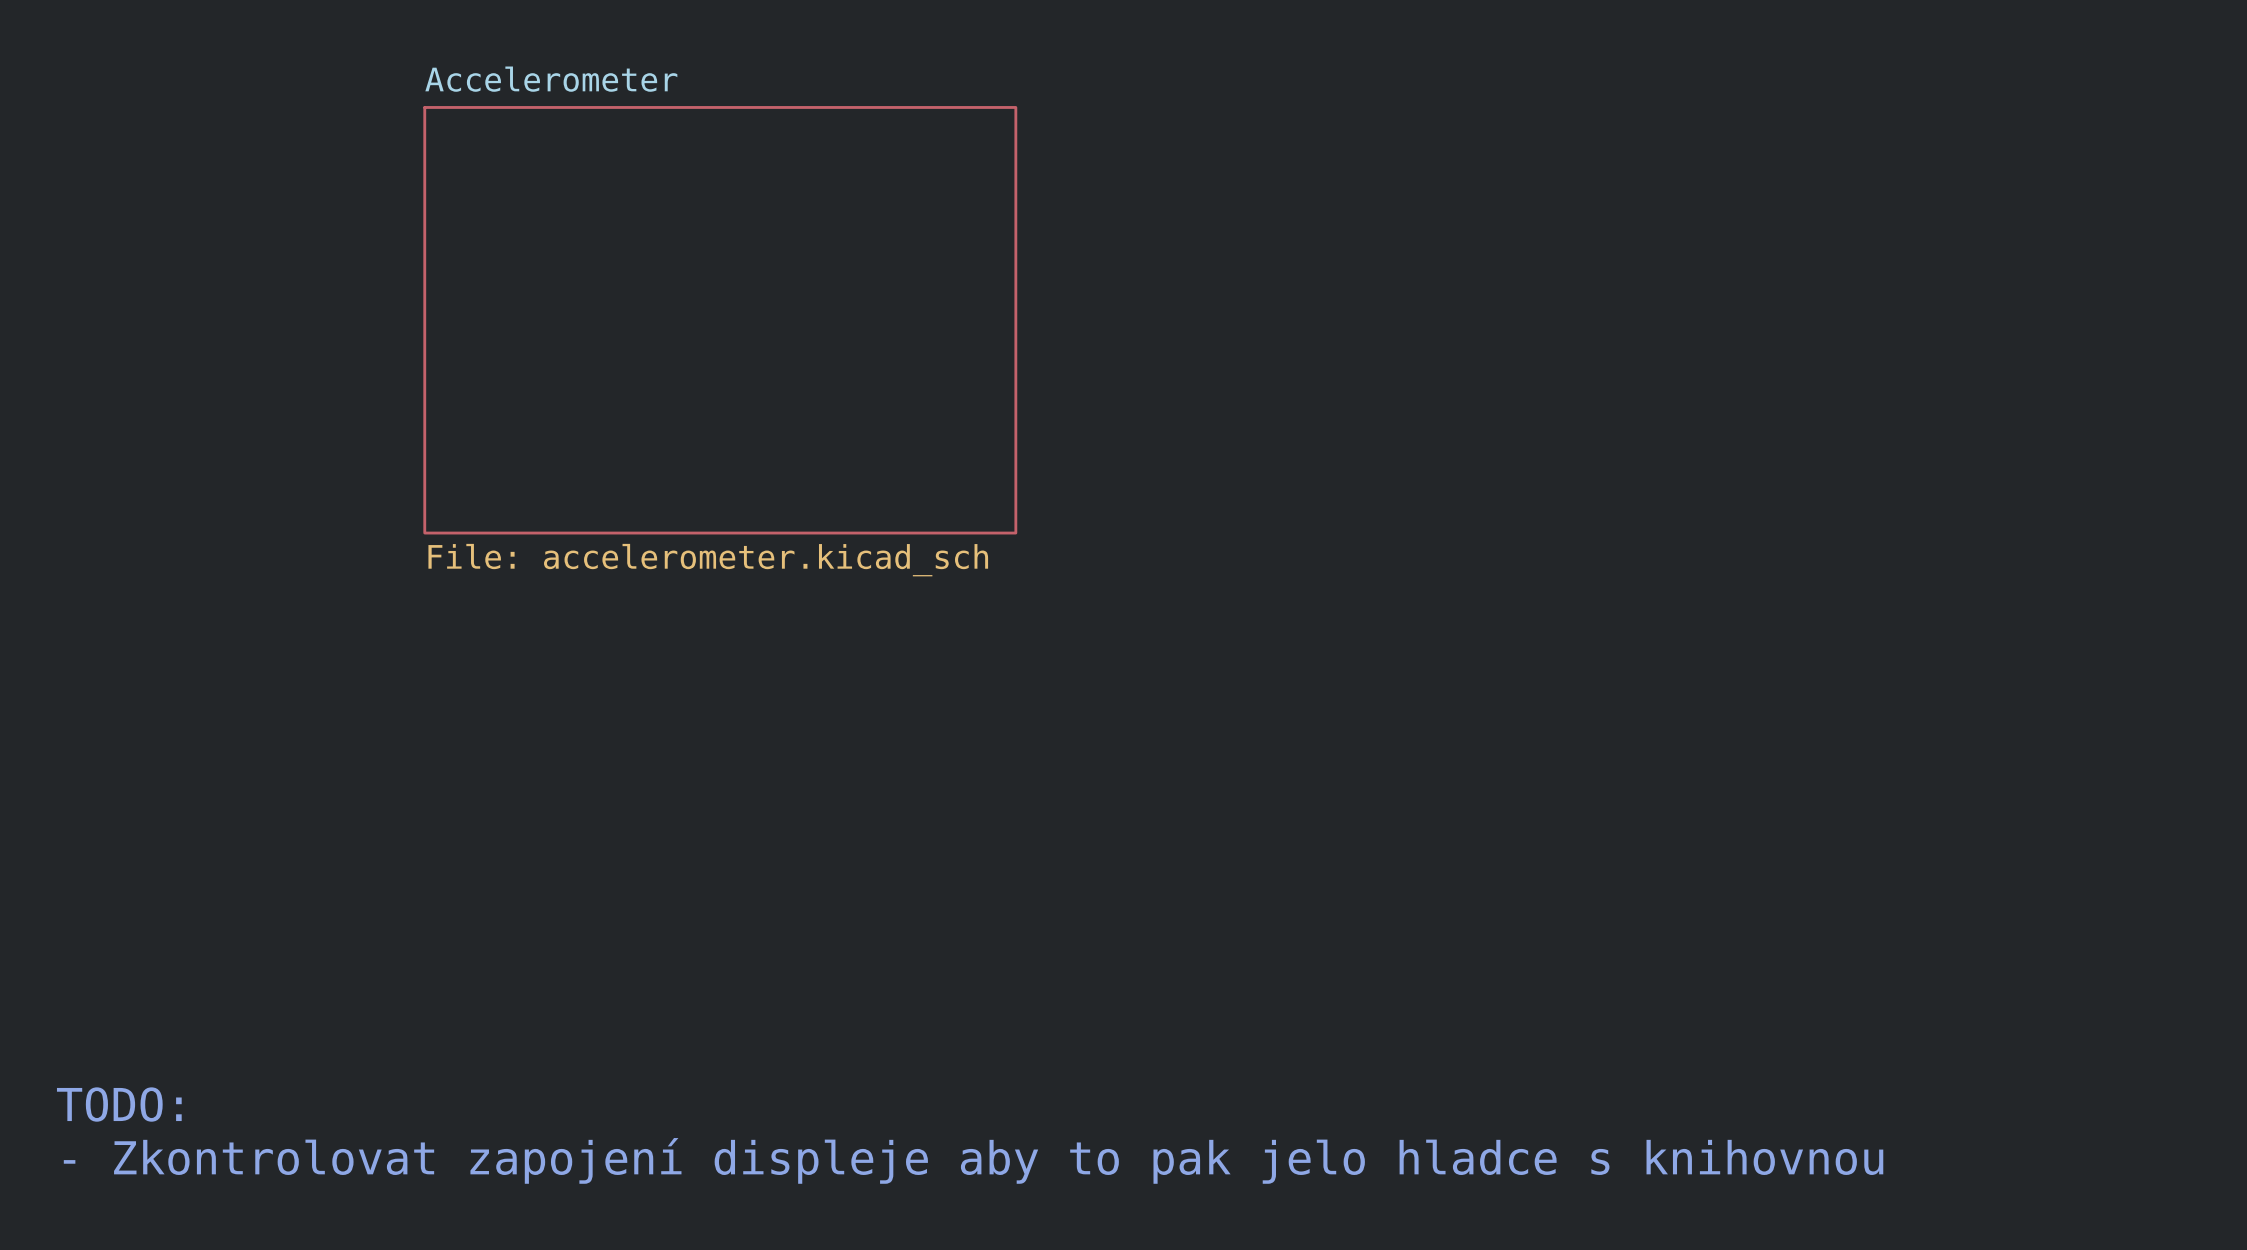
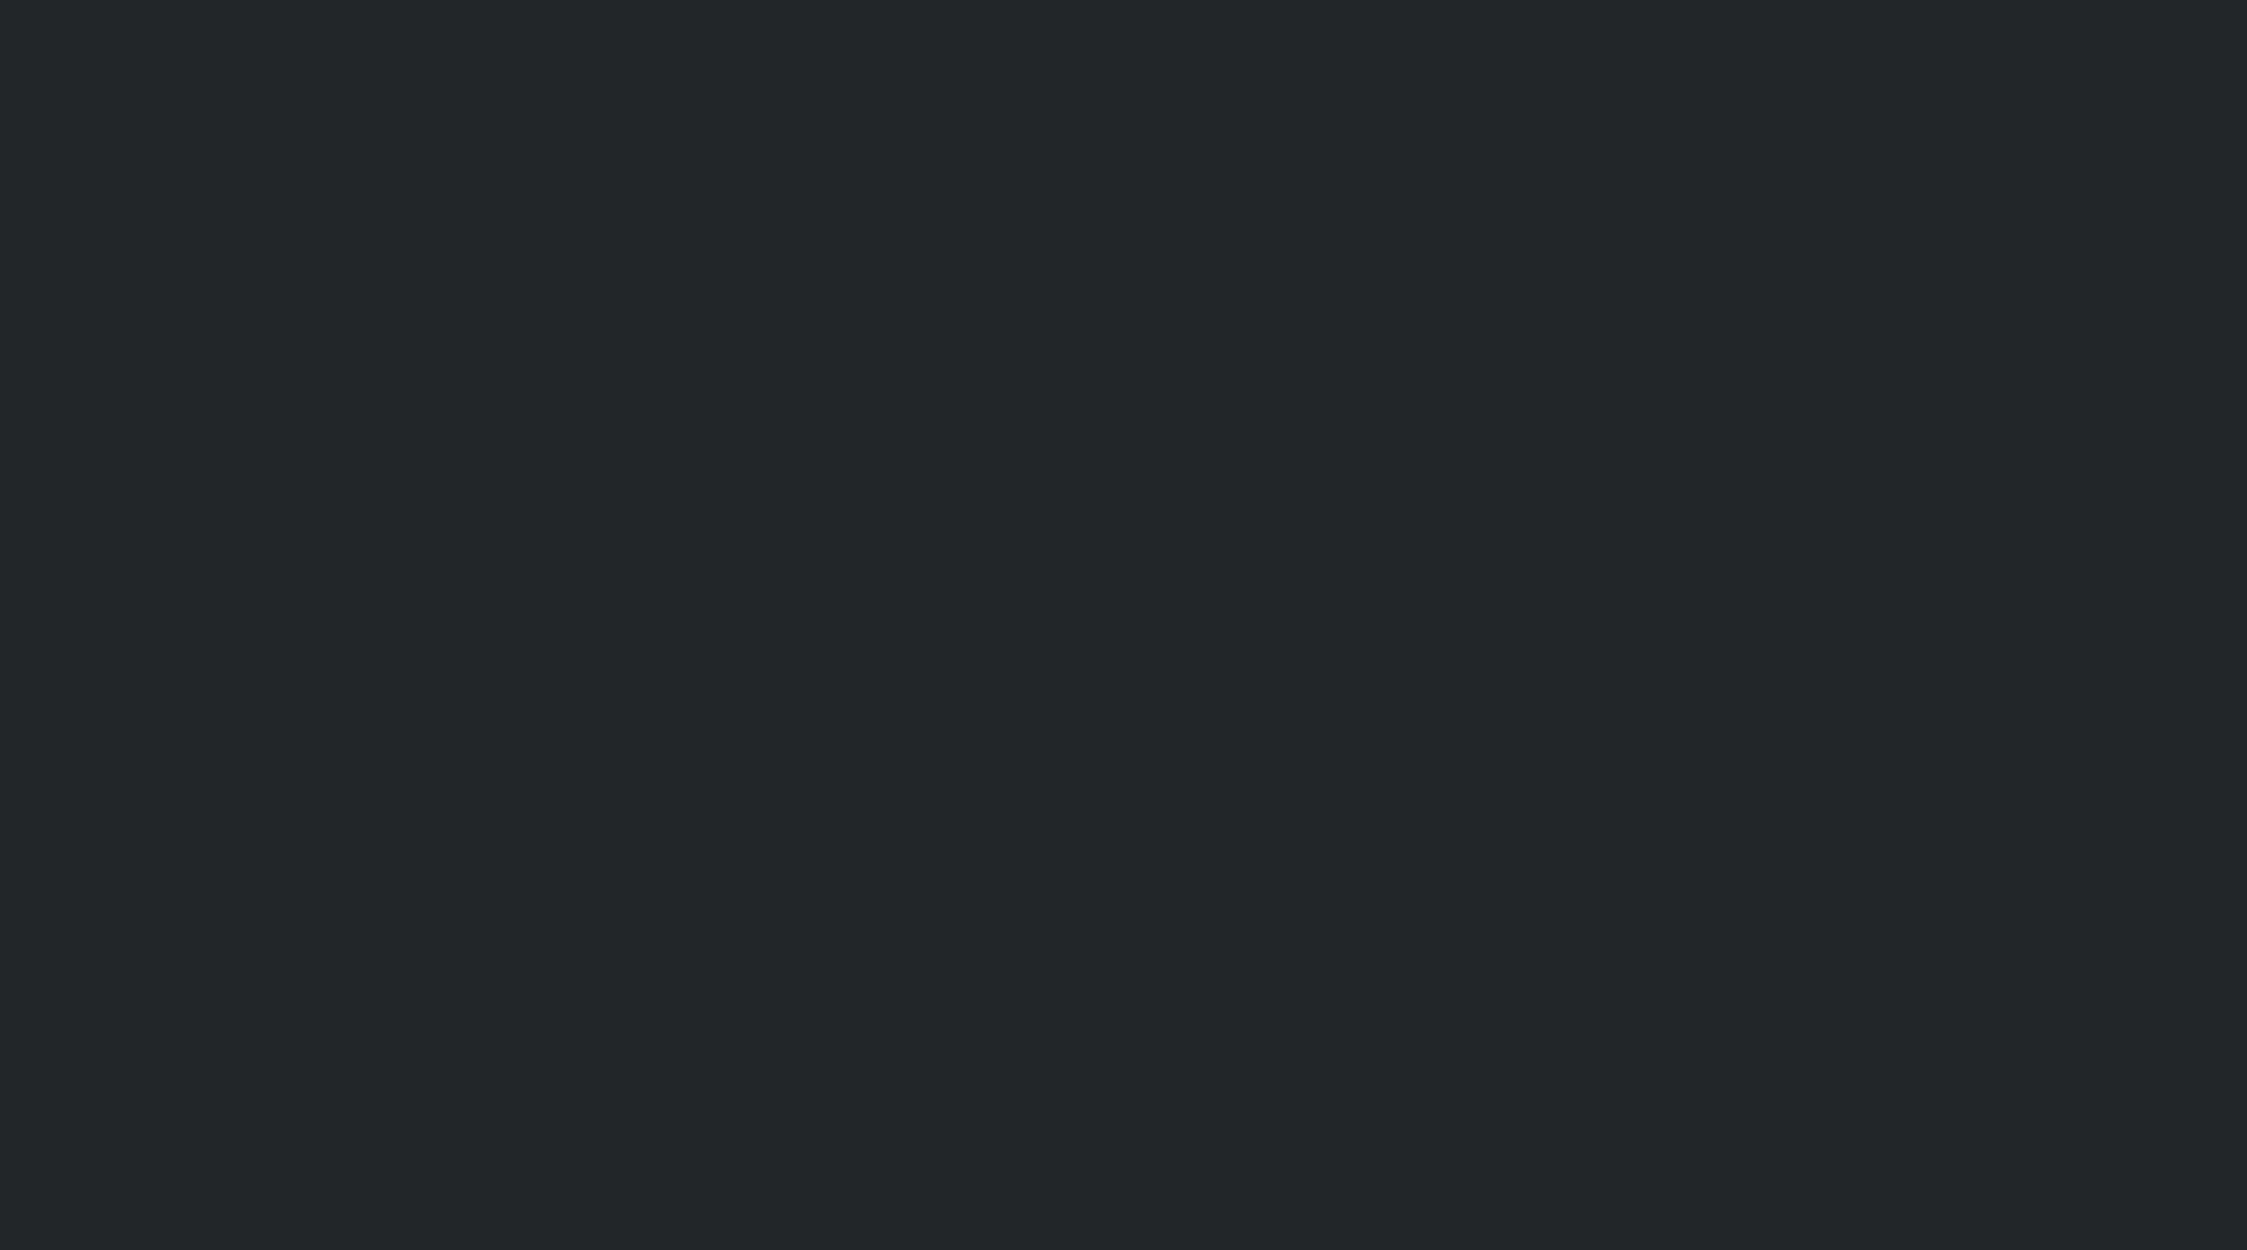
sheet Accelerometer: File: accelerometer.kicad_sch (720, 320) -> none
text: TODO: (119, 1104) -> none
text: - Zkontrolovat zapojení displeje aby to pak jelo hladce s knihovnou (973, 1160) -> none

